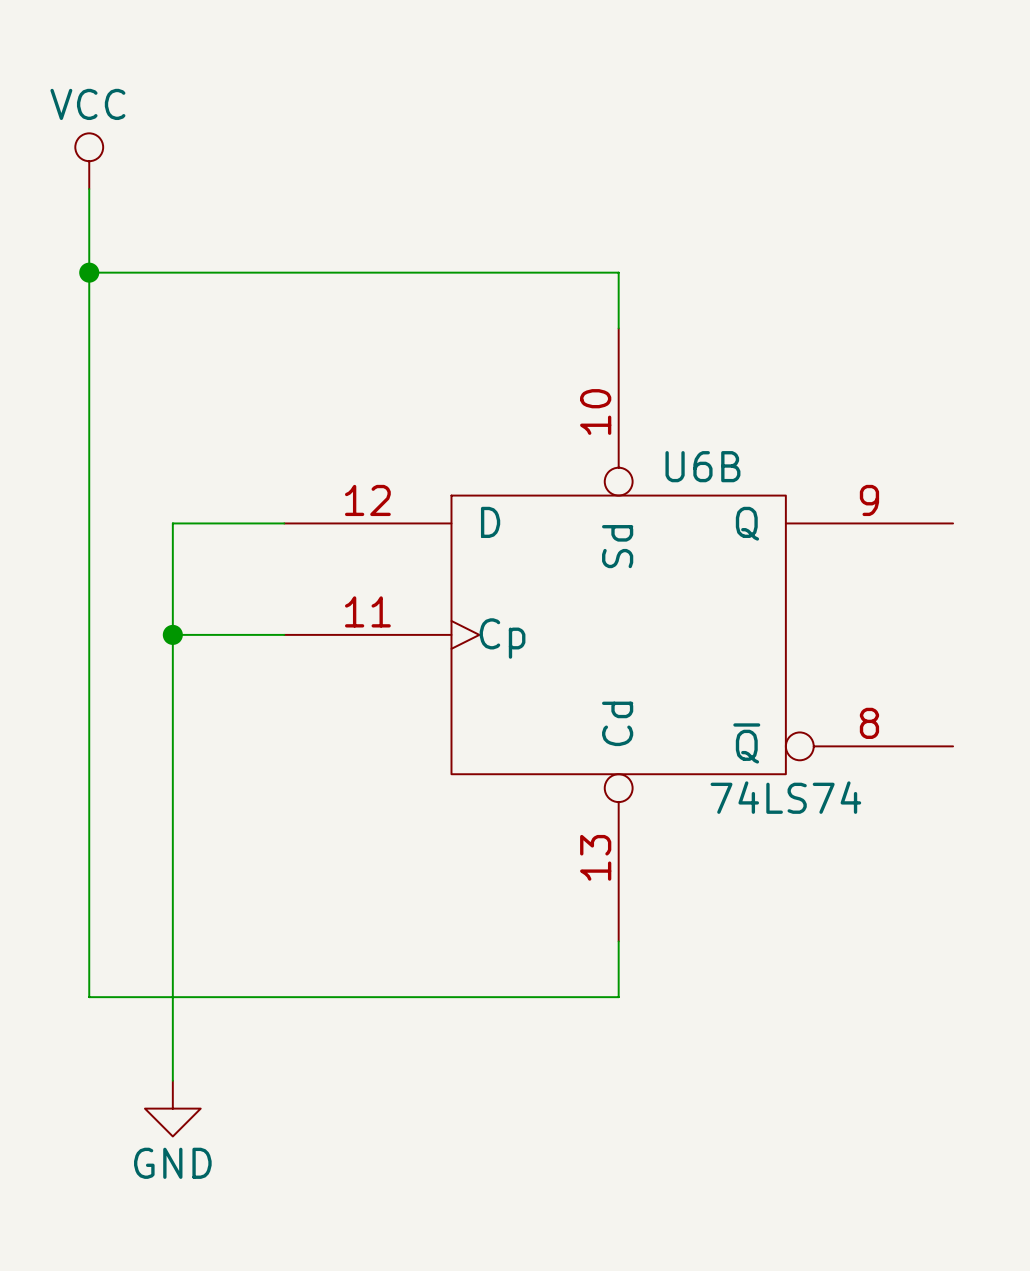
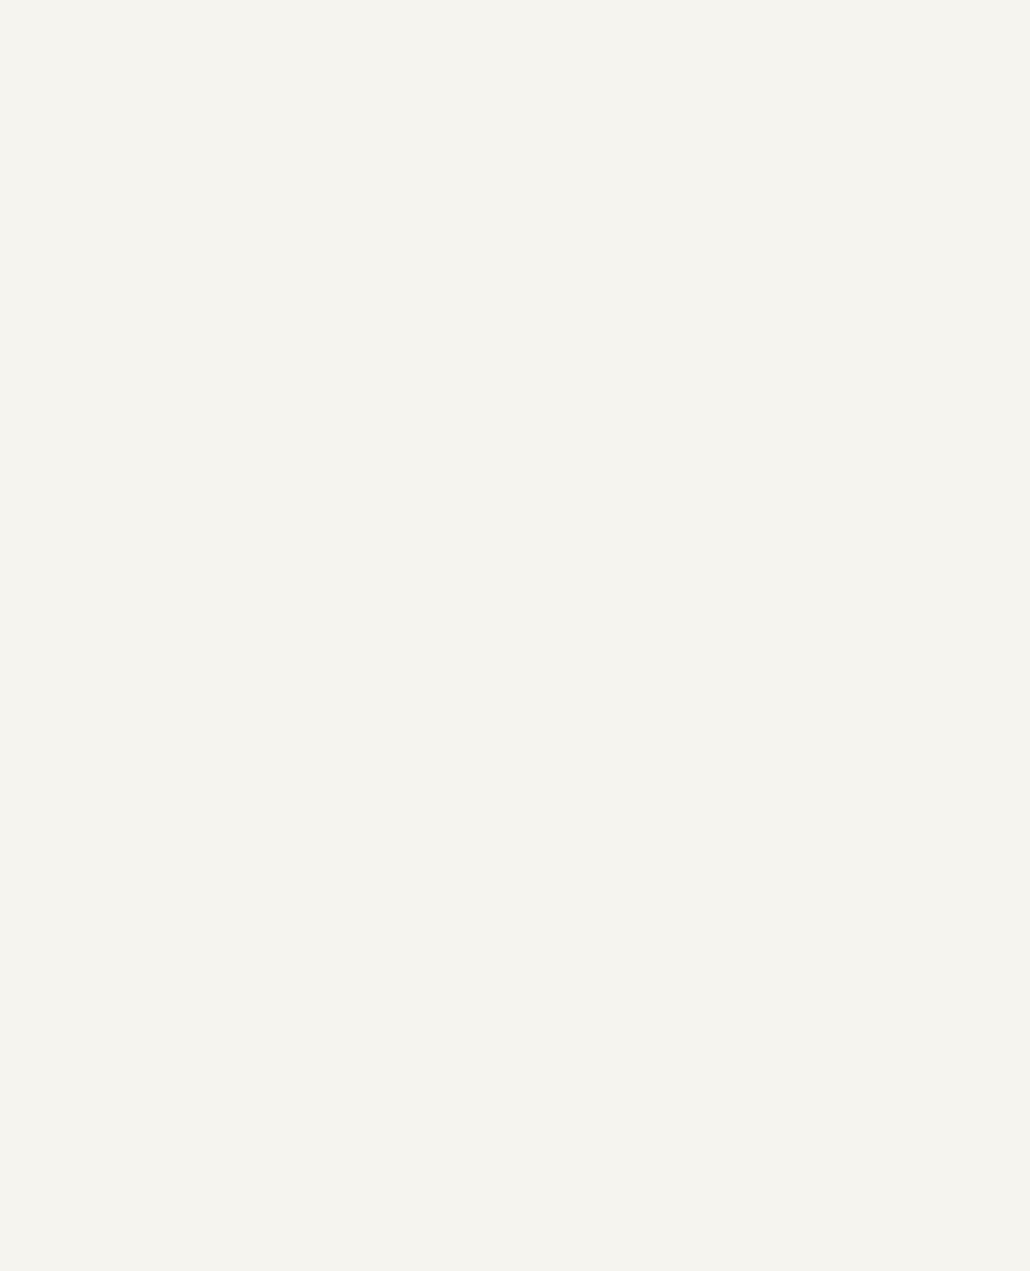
power symbol: VCC (89, 161) -> none
wire: (89, 189) (89, 997) (618, 997) (618, 941) -> none
wire: (89, 272) (618, 272) (618, 328) -> none
junction: (89, 272) -> none
wire: (284, 523) (172, 523) (172, 1080) -> none
wire: (172, 634) (284, 634) -> none
junction: (172, 634) -> none
U6B: 74LS74 (618, 634) -> none
power symbol: GND (172, 1108) -> none

